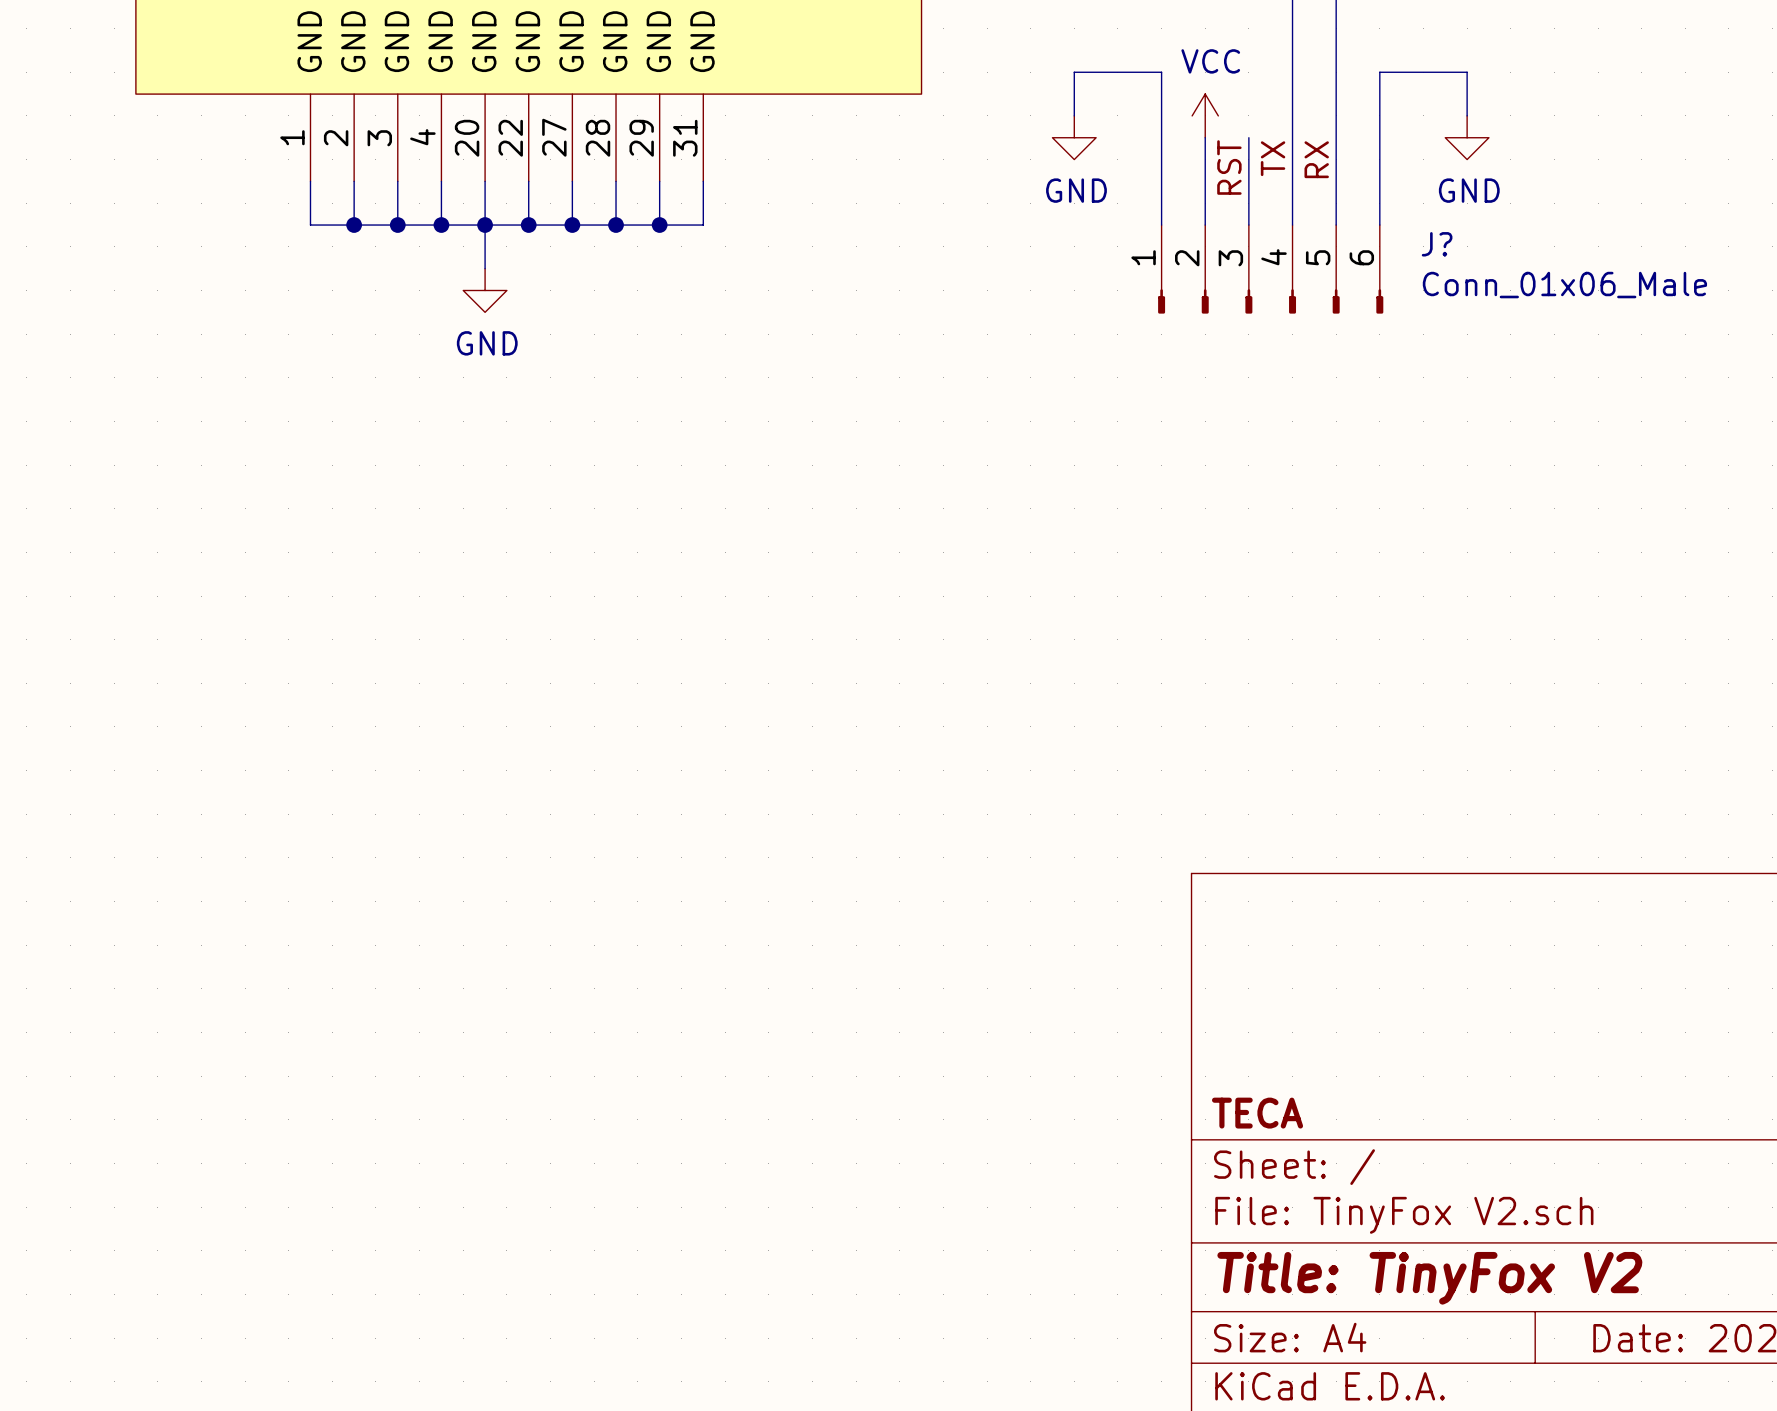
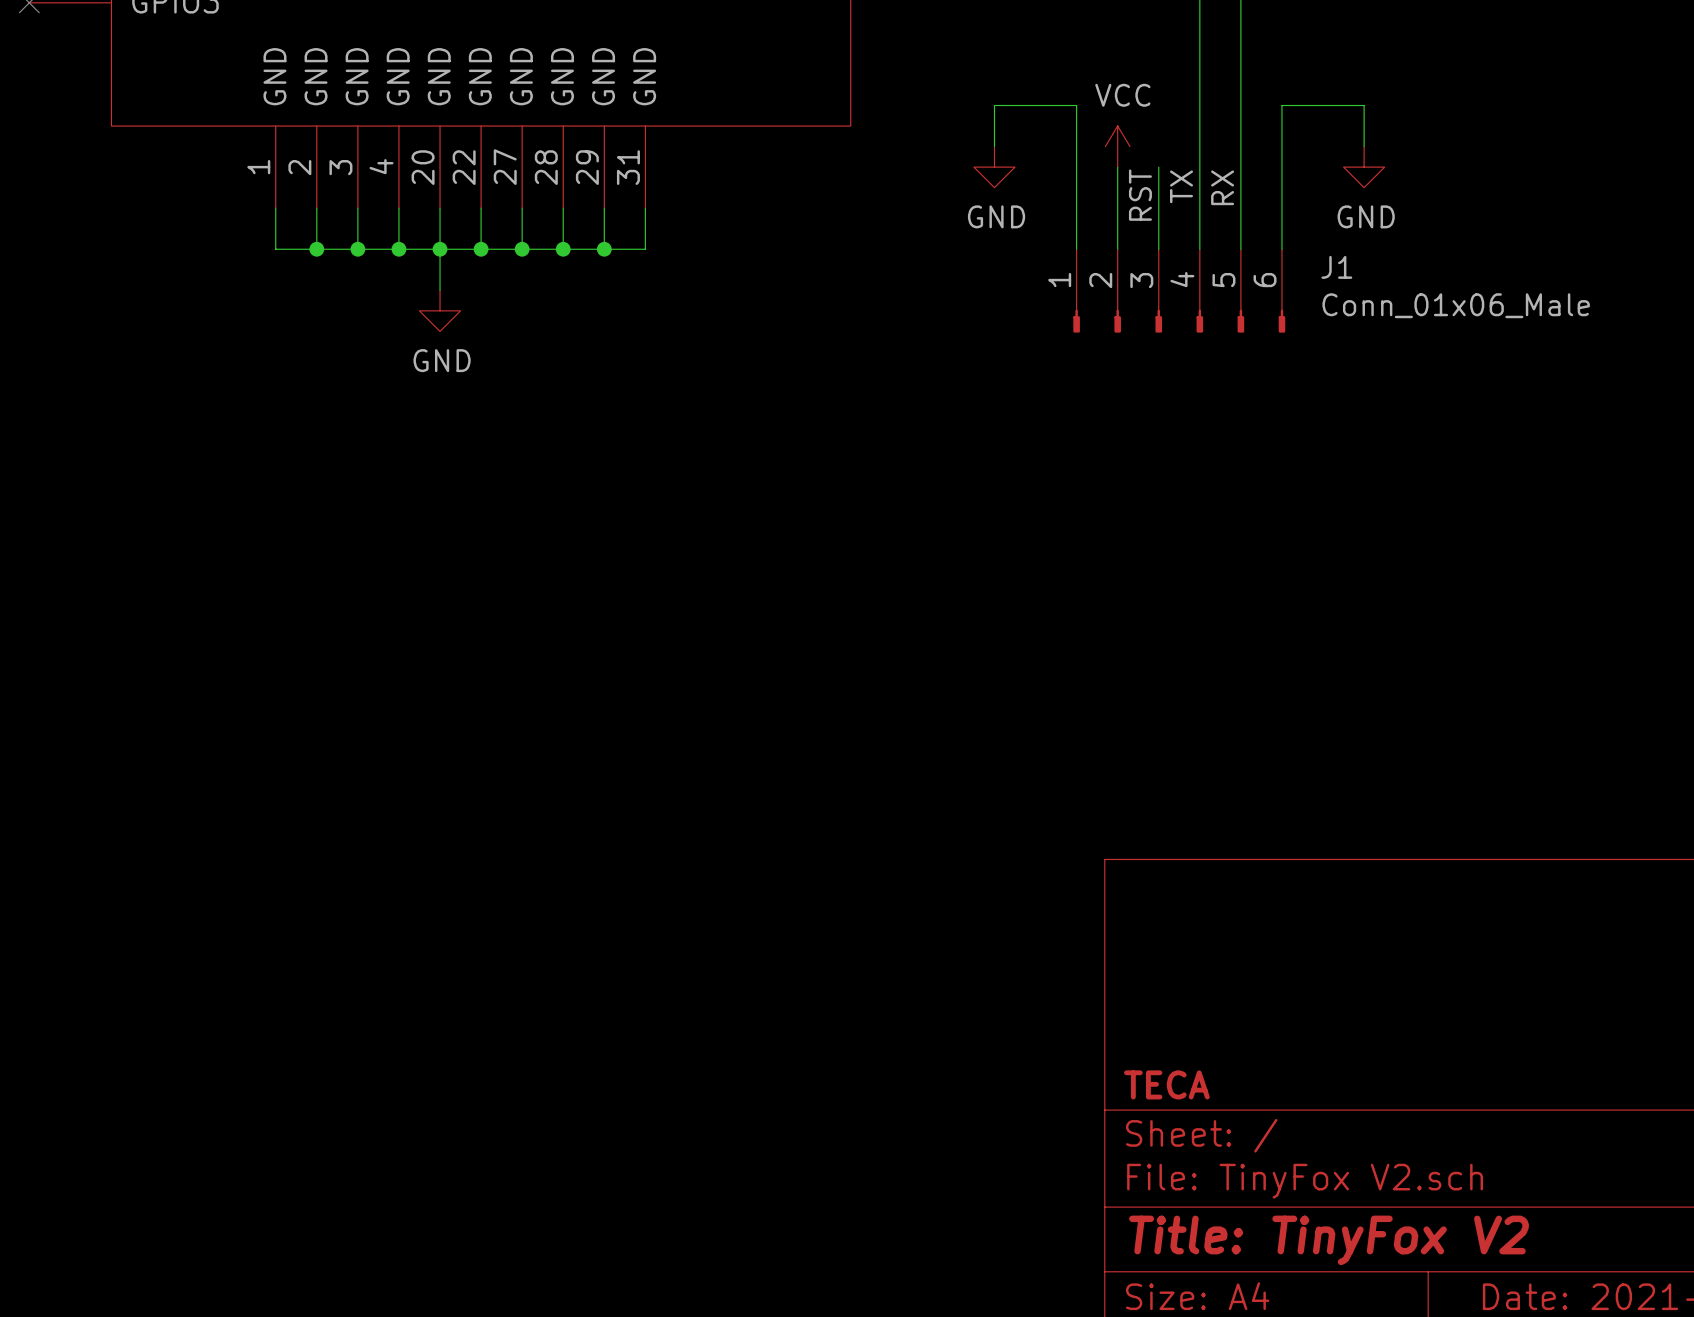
J? name: J? (1437, 244) -> J1 (1336, 267)

